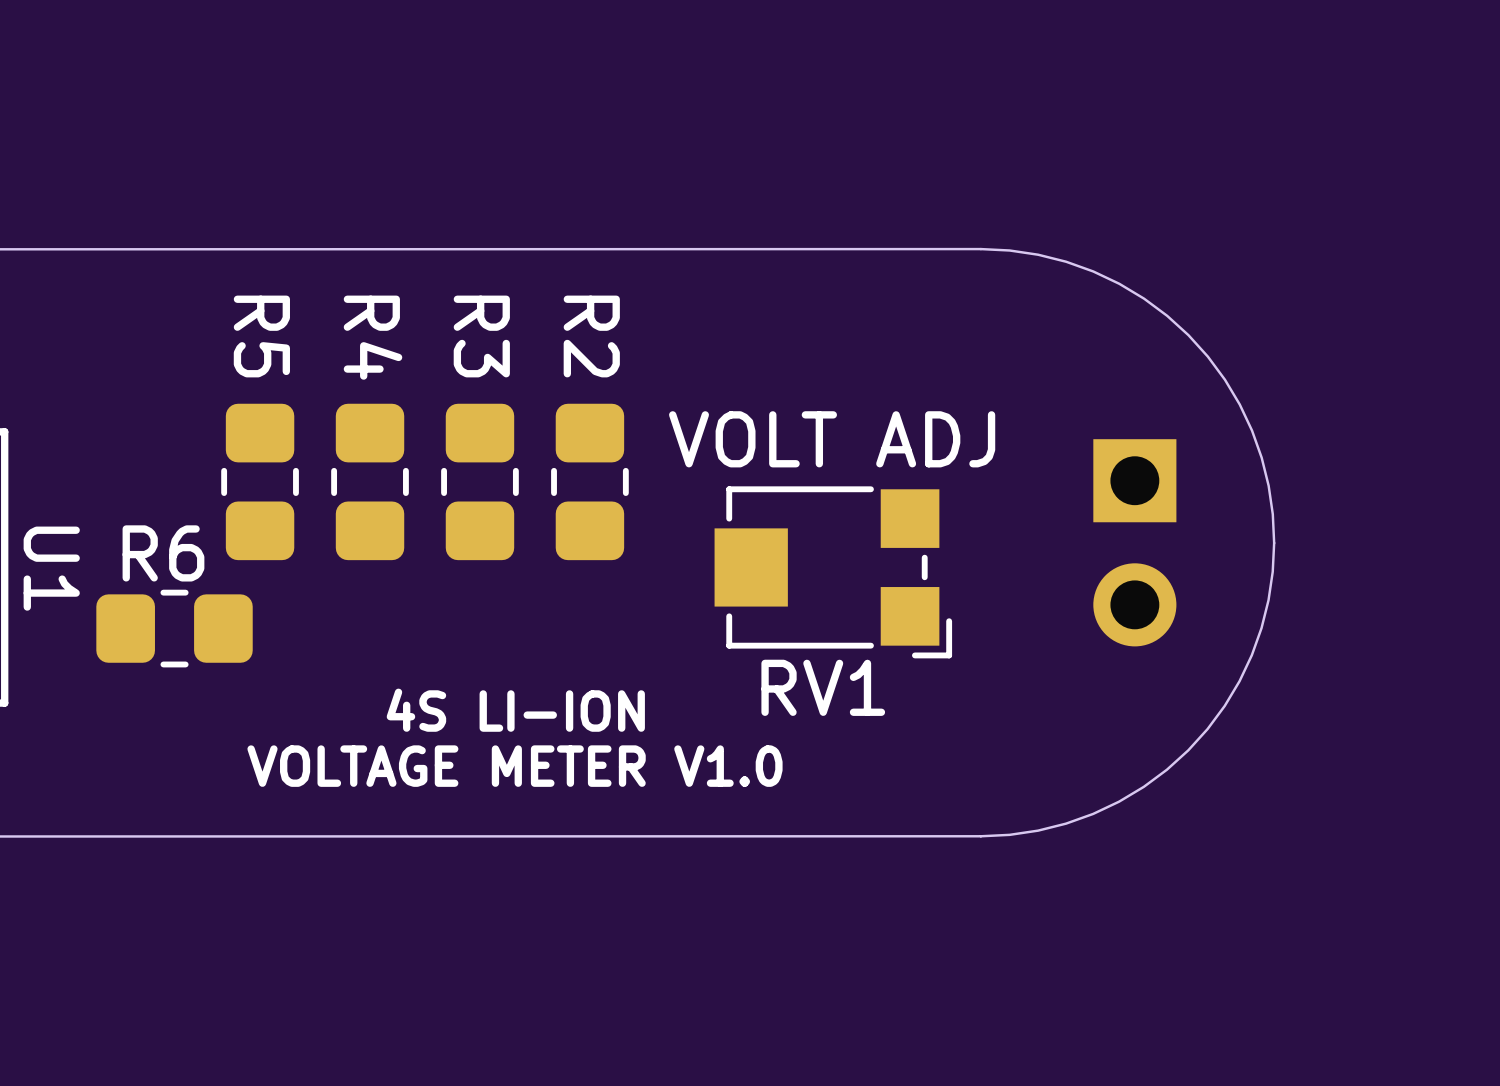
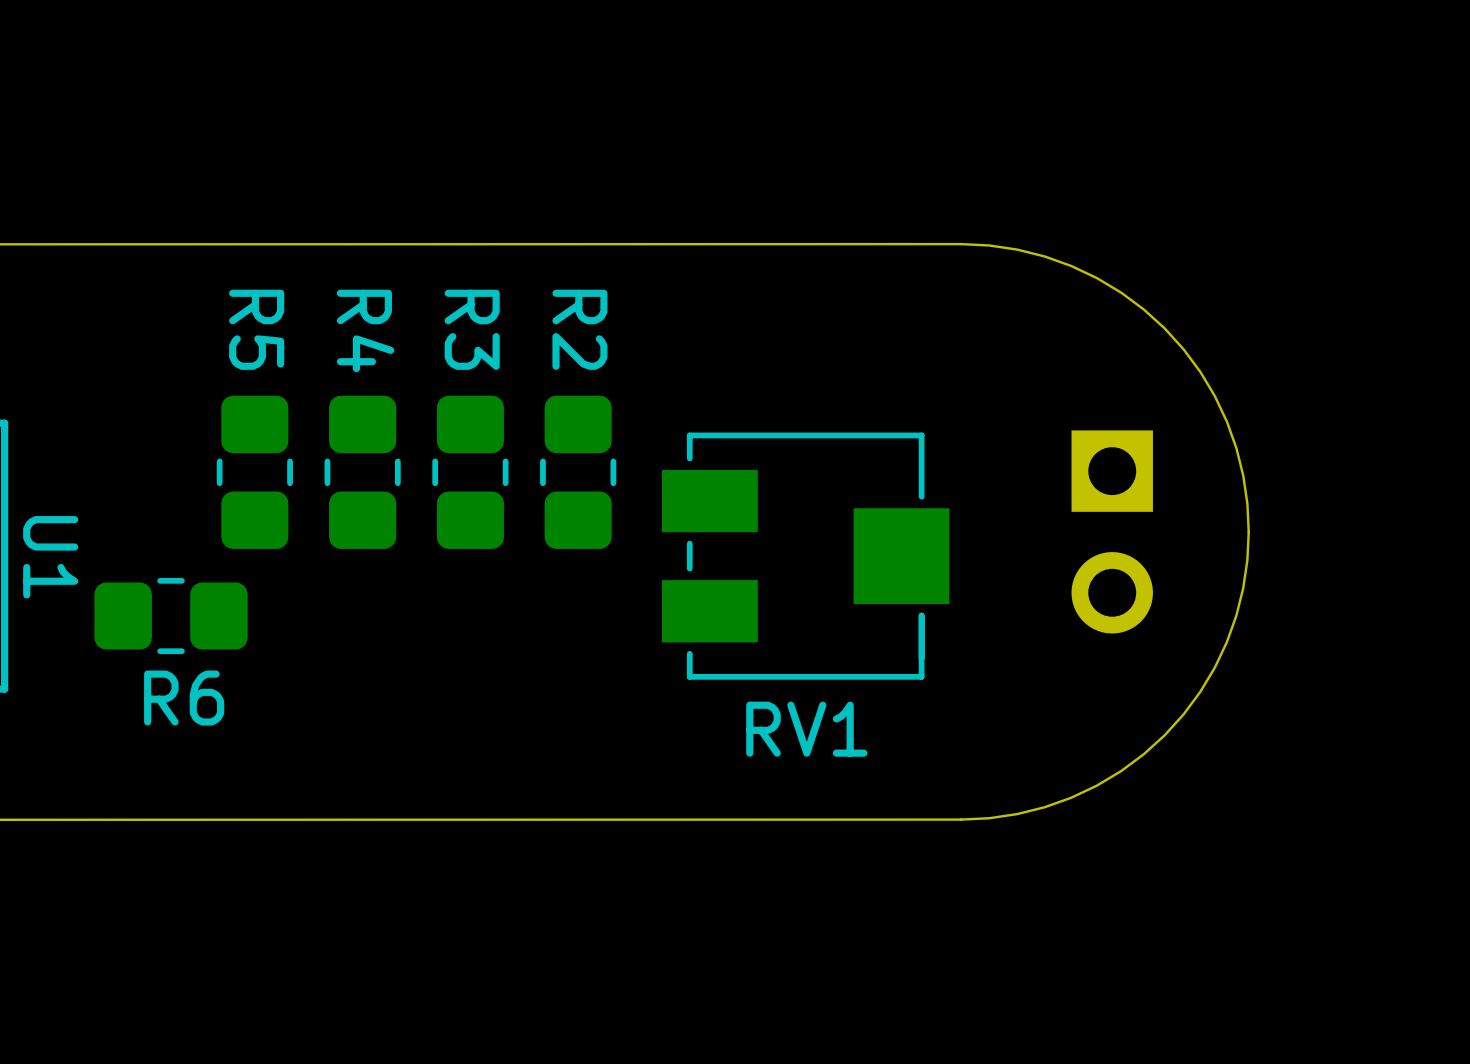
text: VOLT ADJ (832, 439) -> none
RV1 footprint: [714, 486, 953, 659] -> [661, 432, 950, 680]
R6 name position: R6 (163, 553) -> R6 (184, 698)
text: 4S LI-ION (515, 710) -> none
text: VOLTAGE METER V1.0 (515, 766) -> none

